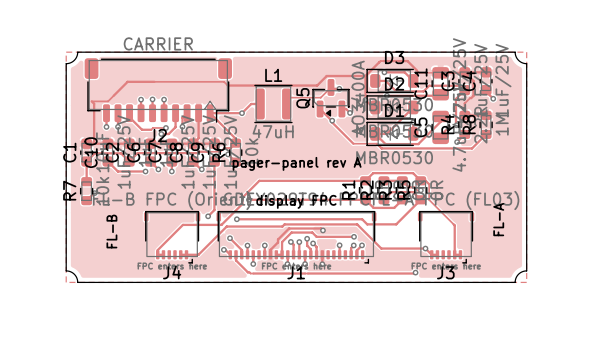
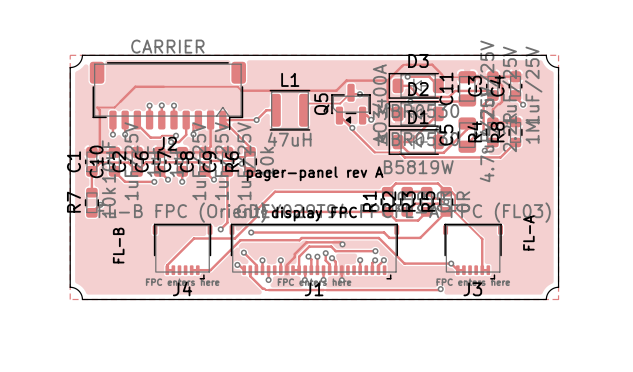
D1 value: MBR0530 (394, 157) -> B5819W (418, 167)

